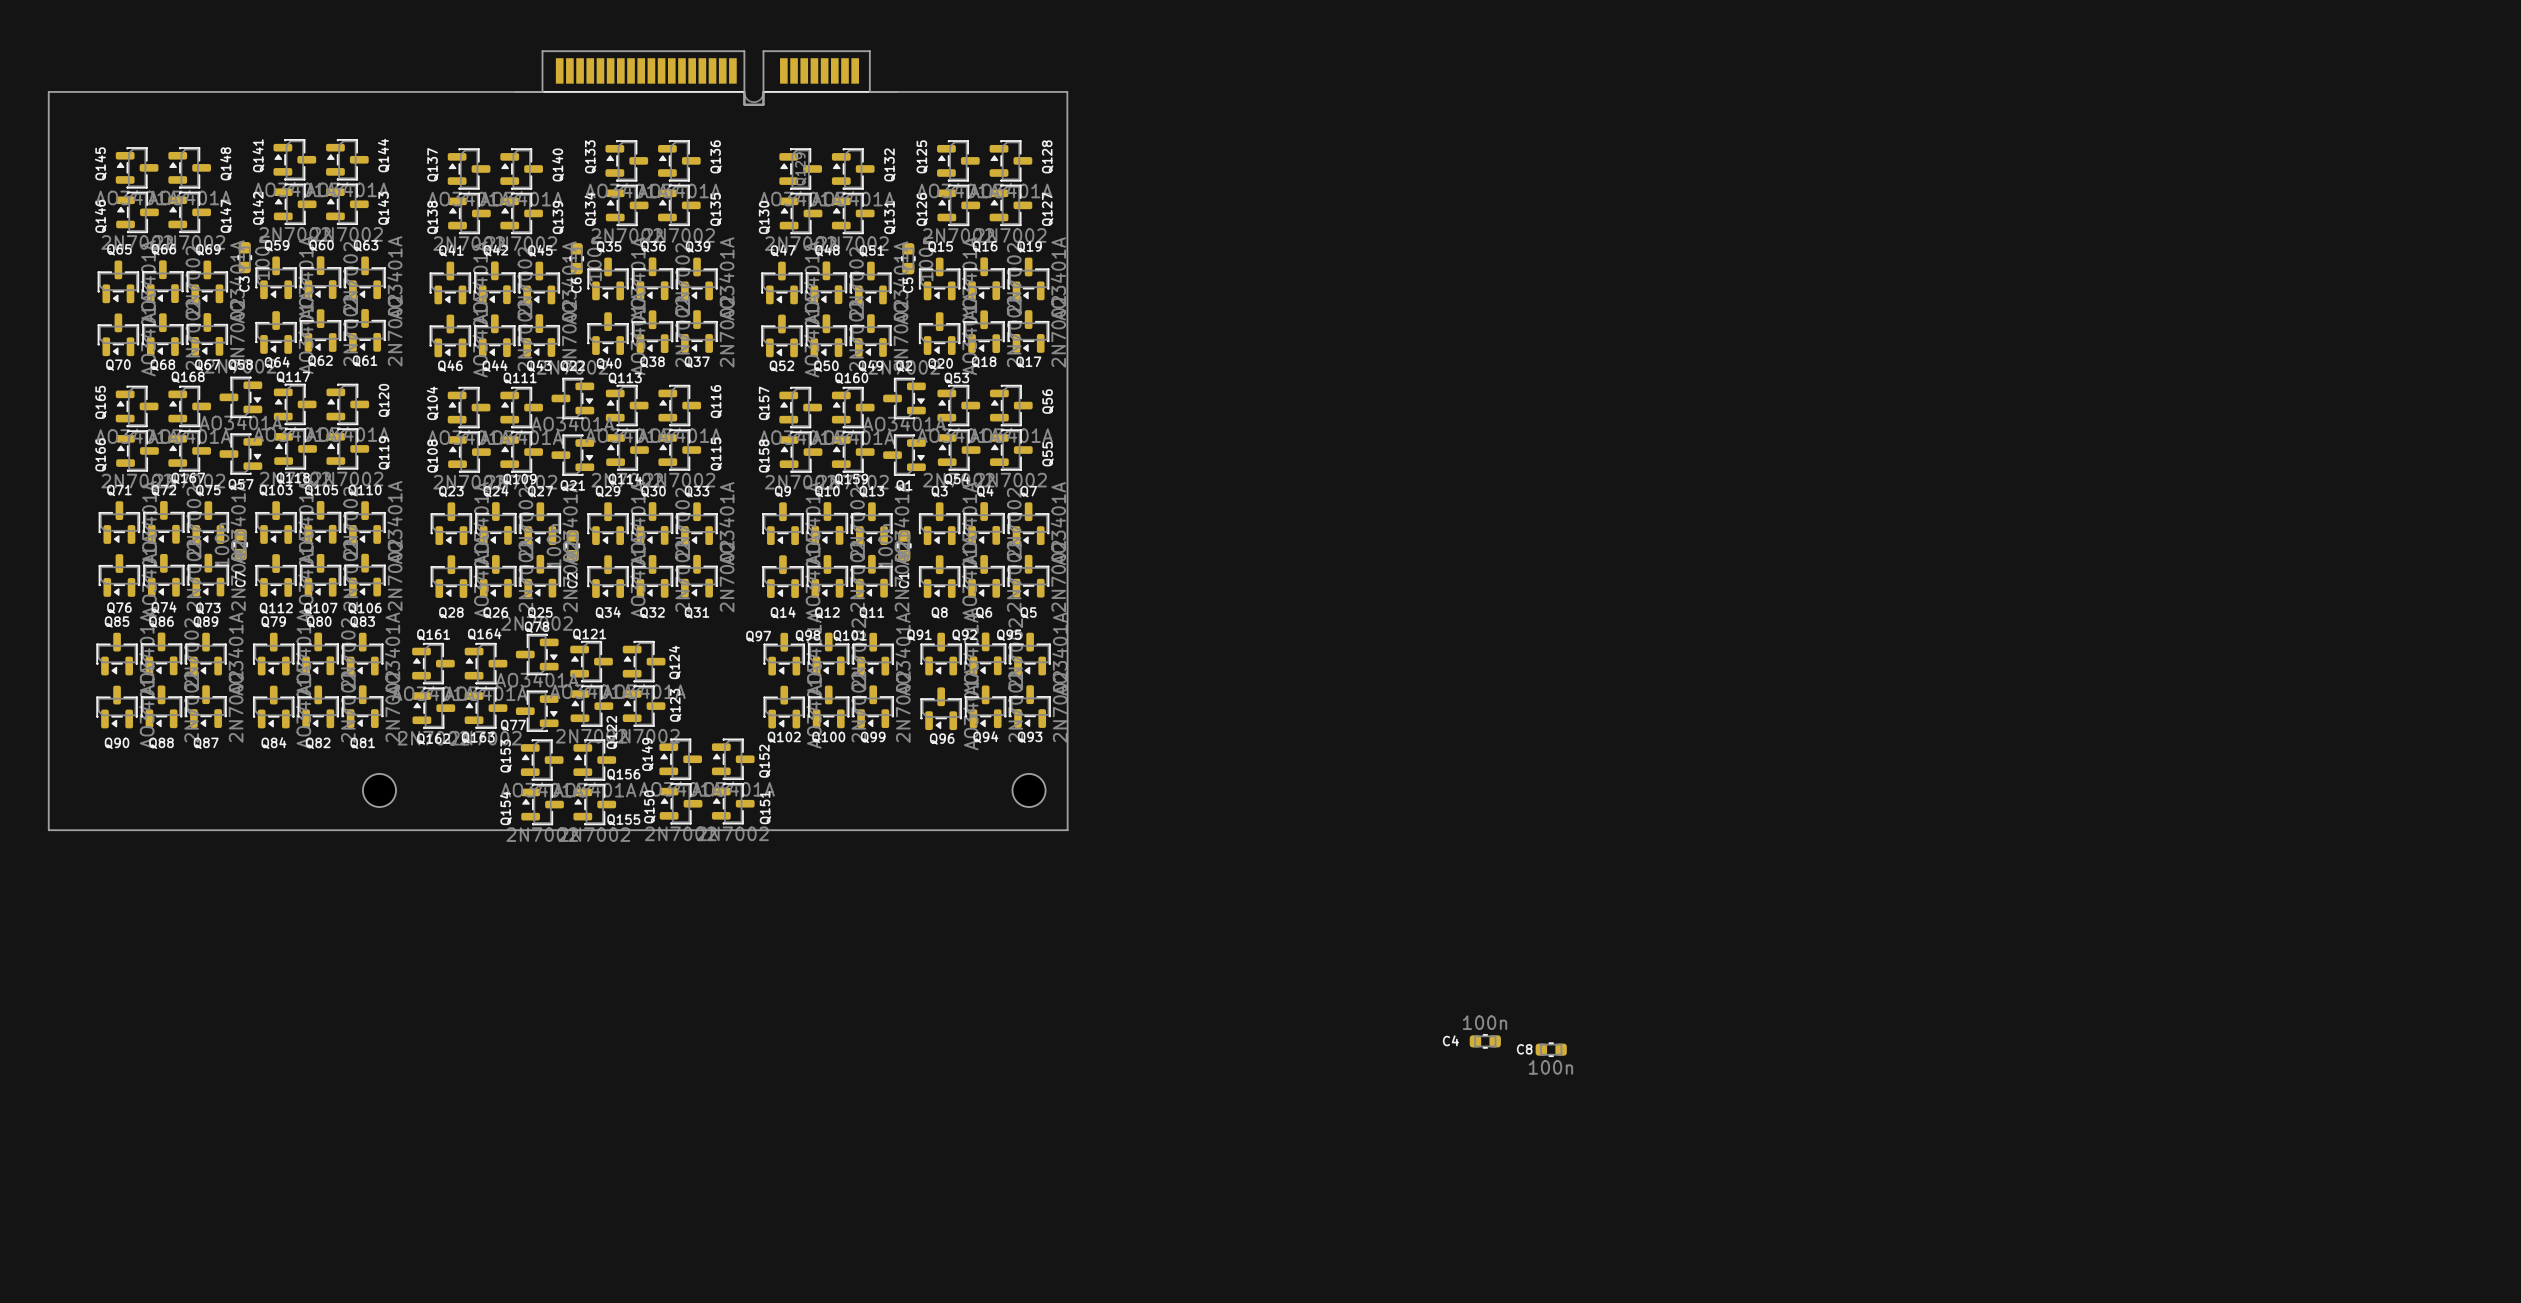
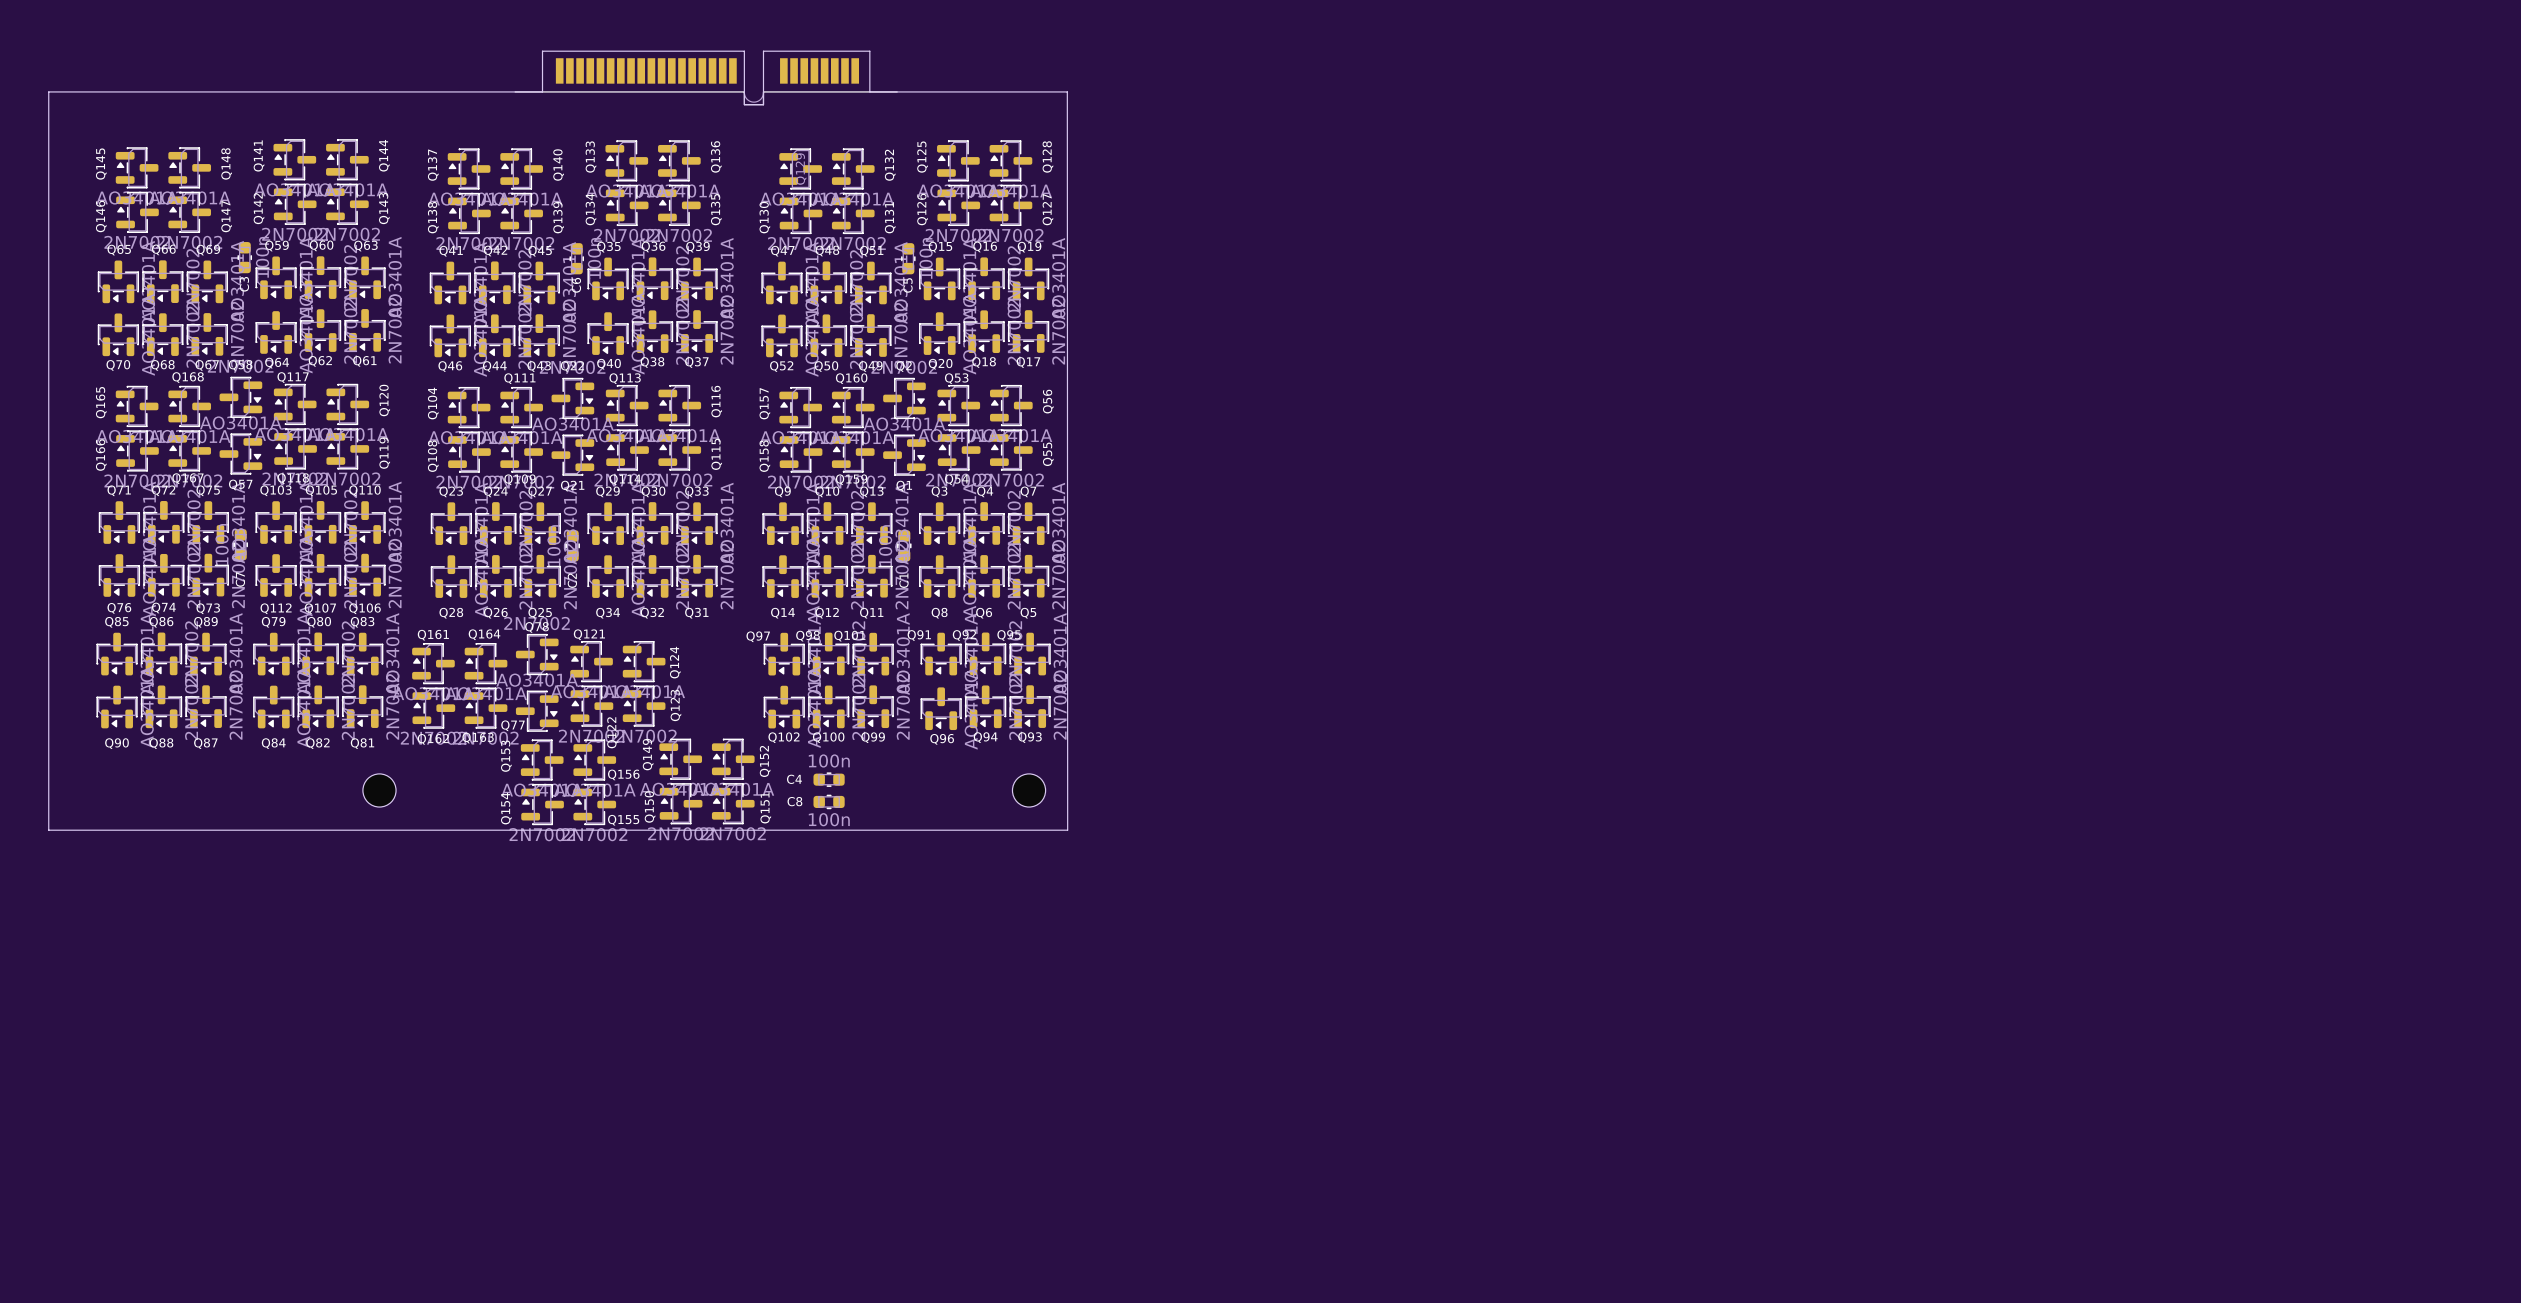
C4 position: (1485, 1041) -> (829, 779)
C8 name position: C8 (1524, 1049) -> C8 (794, 801)
C8 position: (1551, 1049) -> (829, 801)

